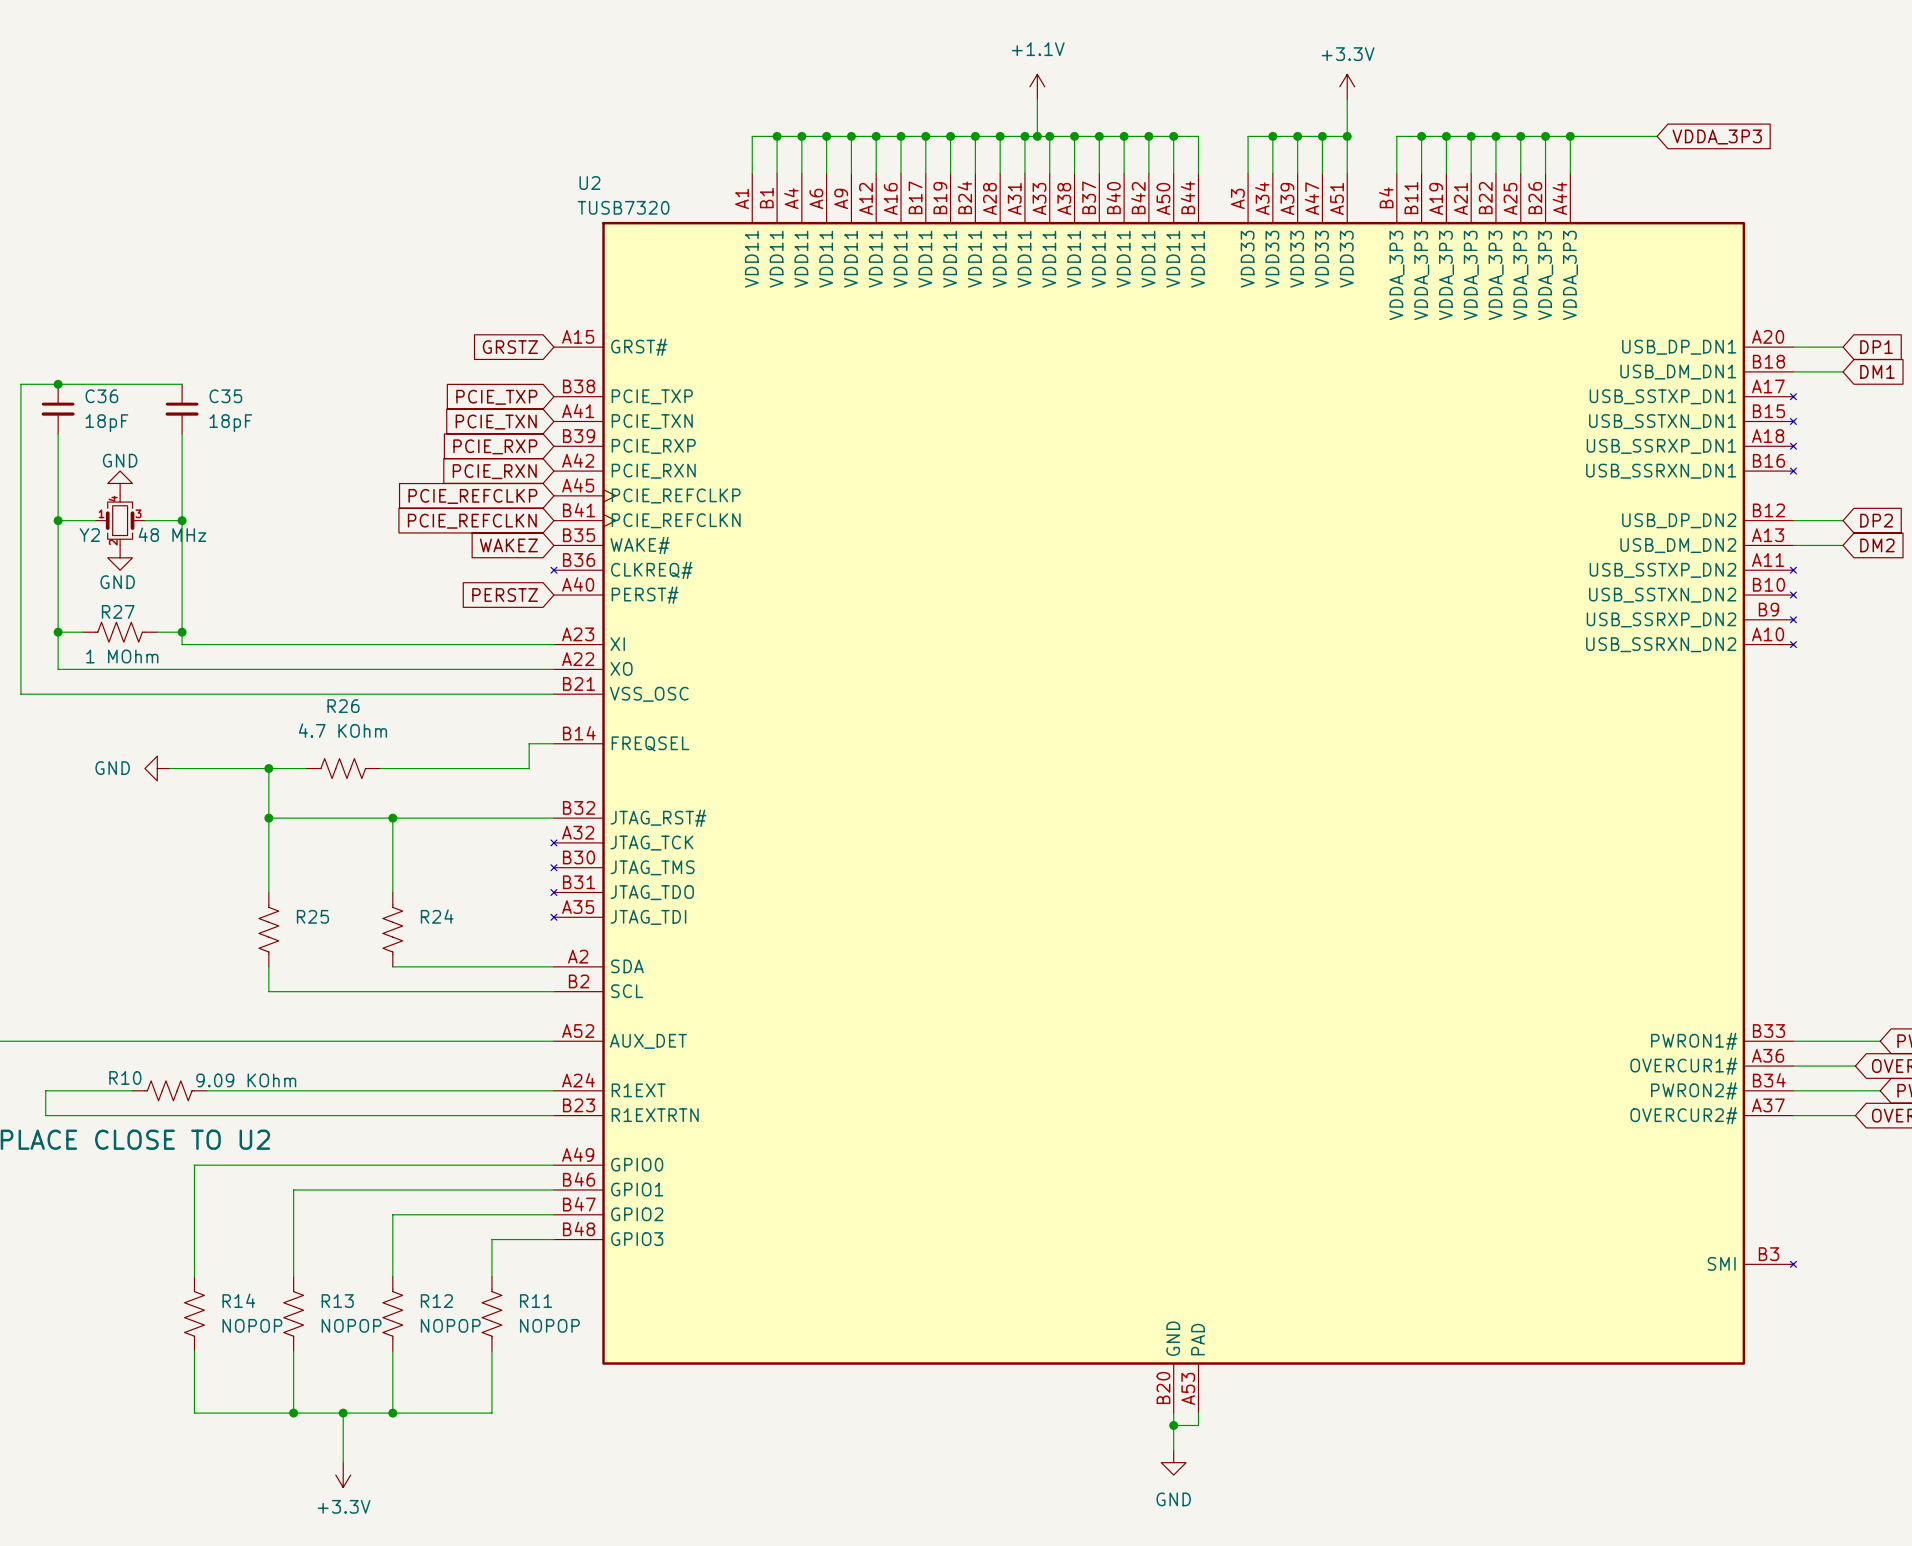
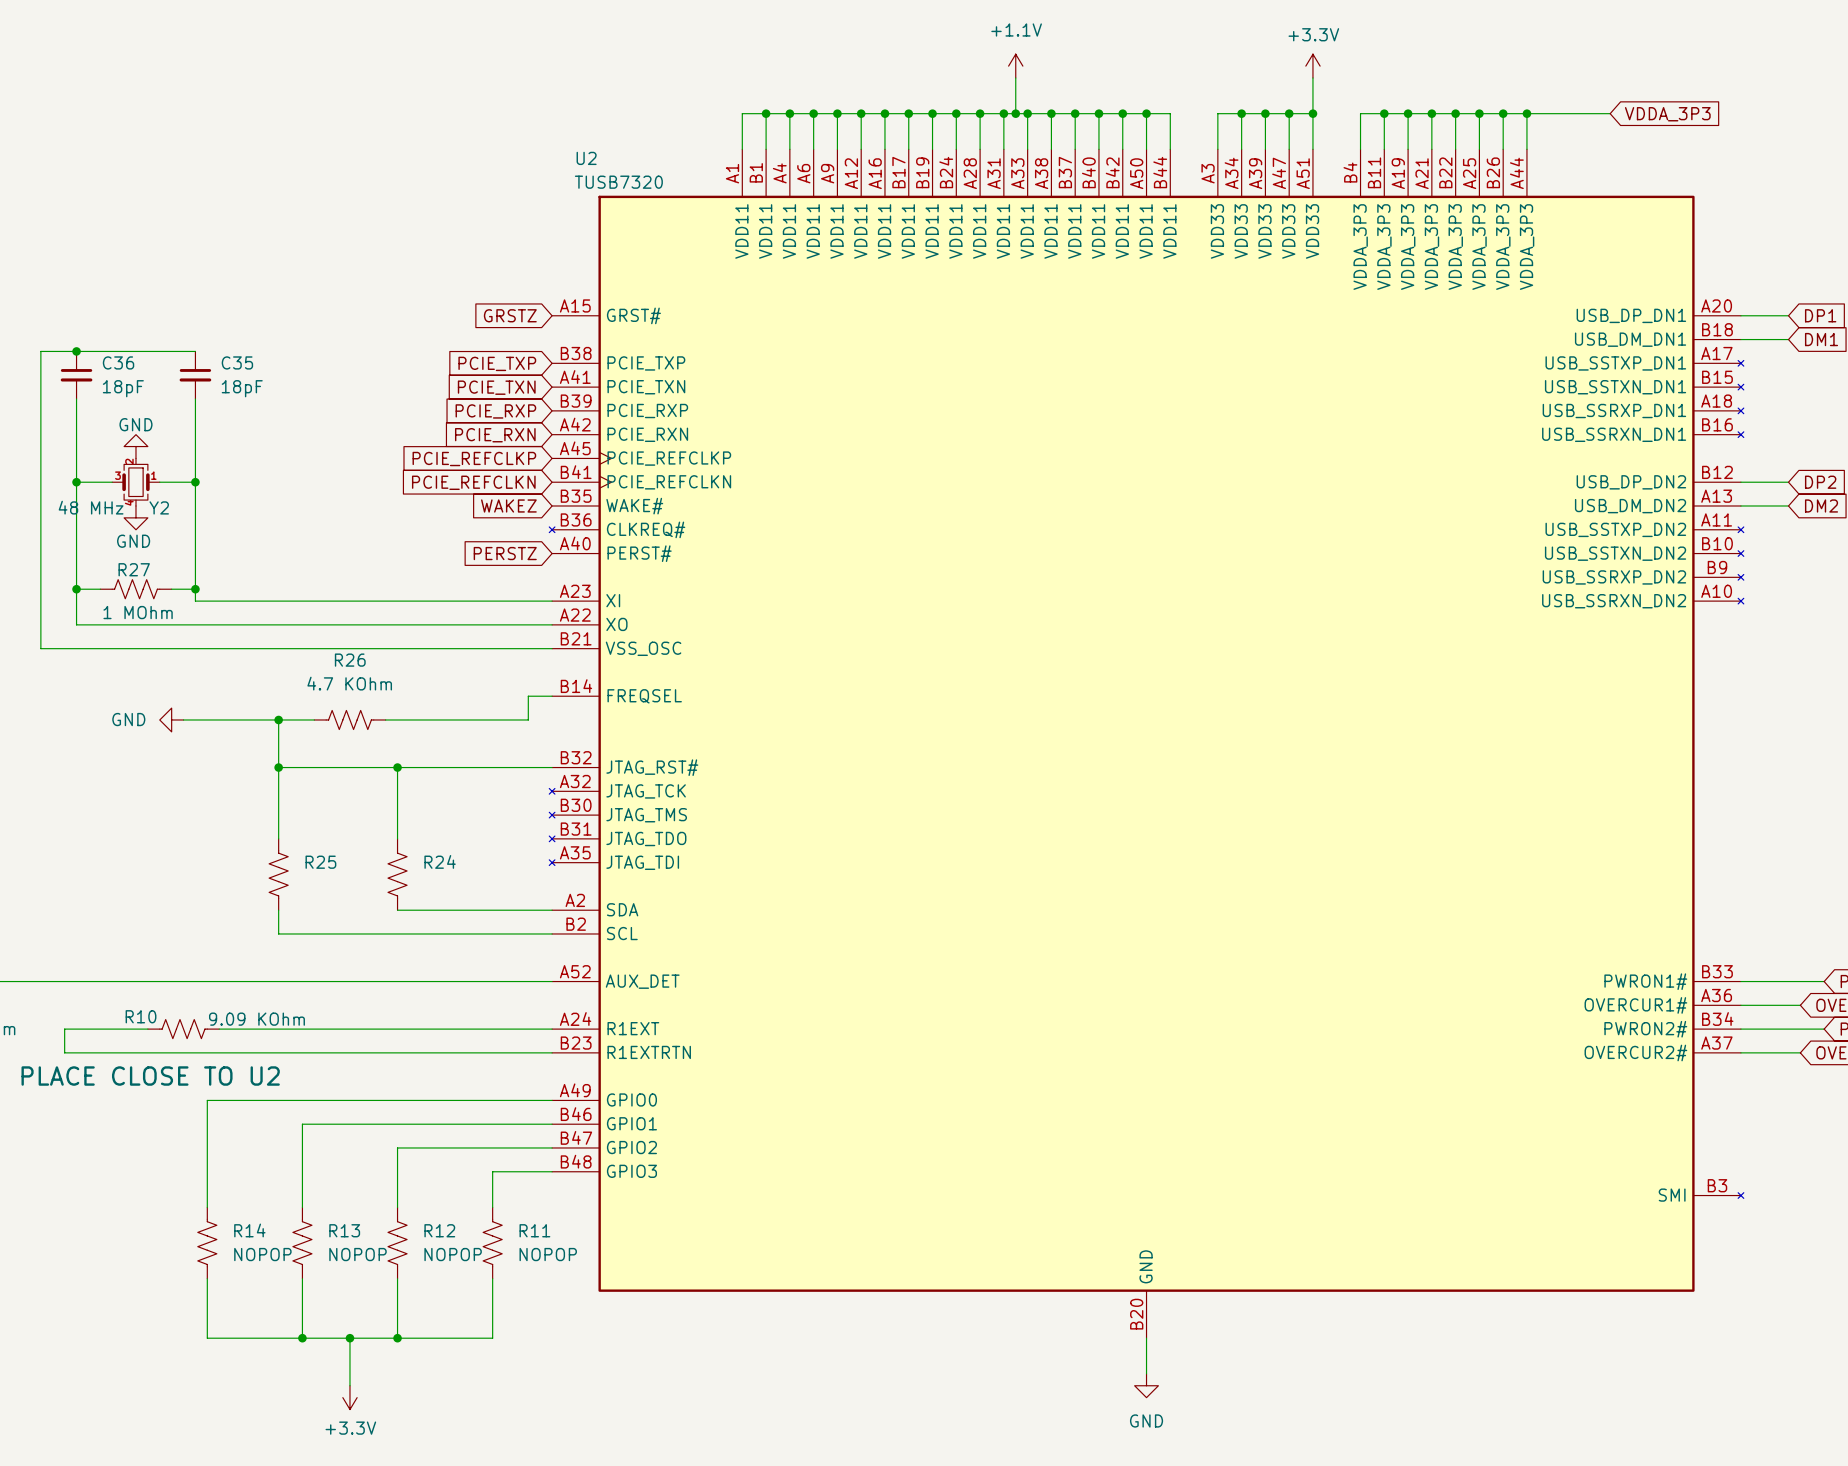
U2 symbol: [551, 173, 1797, 1414] -> [549, 149, 1744, 1339]
Y2 rotation: 0° (120, 520) -> 180° (135, 482)
Y2 value position: 48 MHz (172, 534) -> 48 MHz (91, 507)
Y2 name position: Y2 (89, 535) -> Y2 (159, 507)
wire: (1198, 1413) (1198, 1425) (1173, 1425) -> none
junction: (1173, 1425) -> none

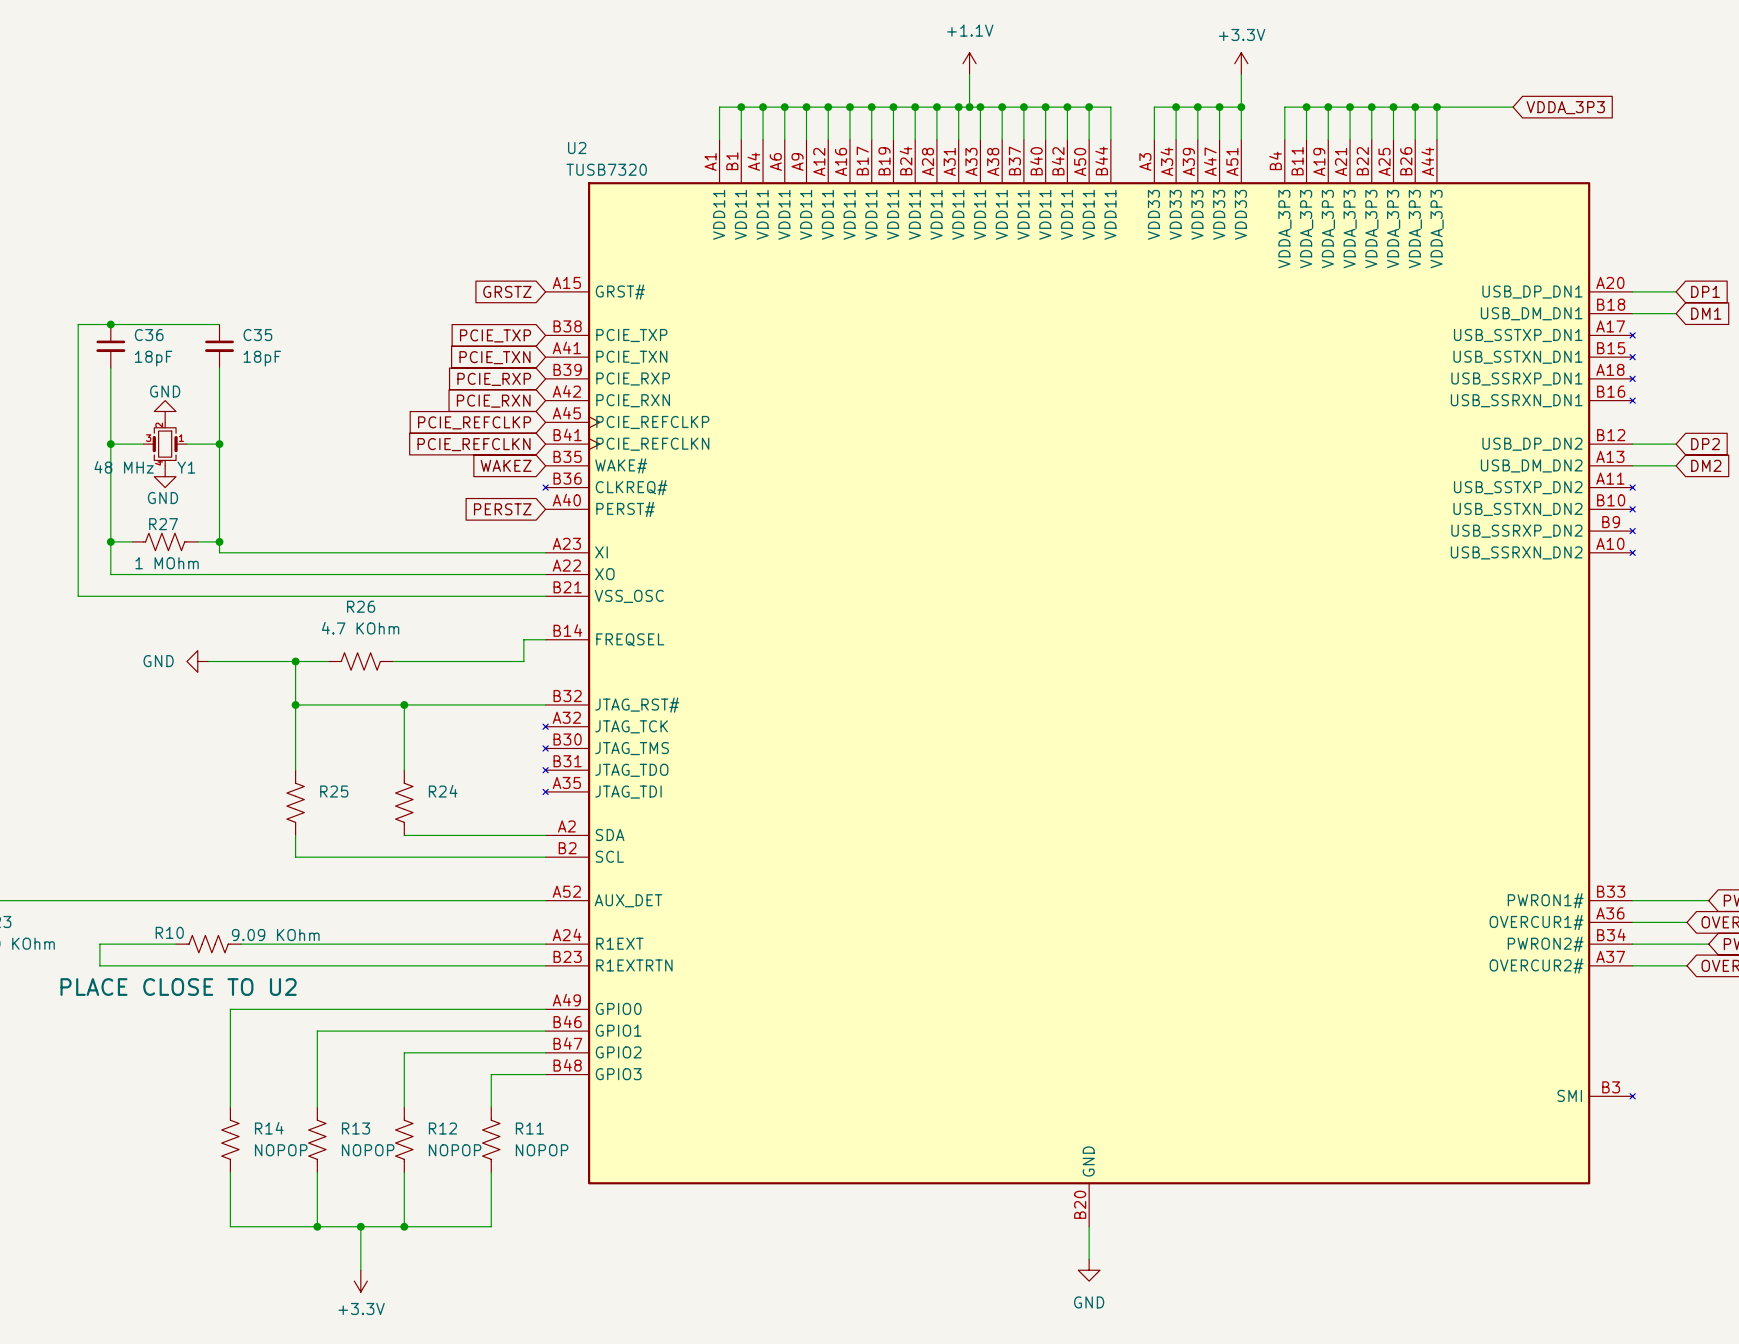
Y2 name: Y2 (159, 507) -> Y1 (186, 467)

